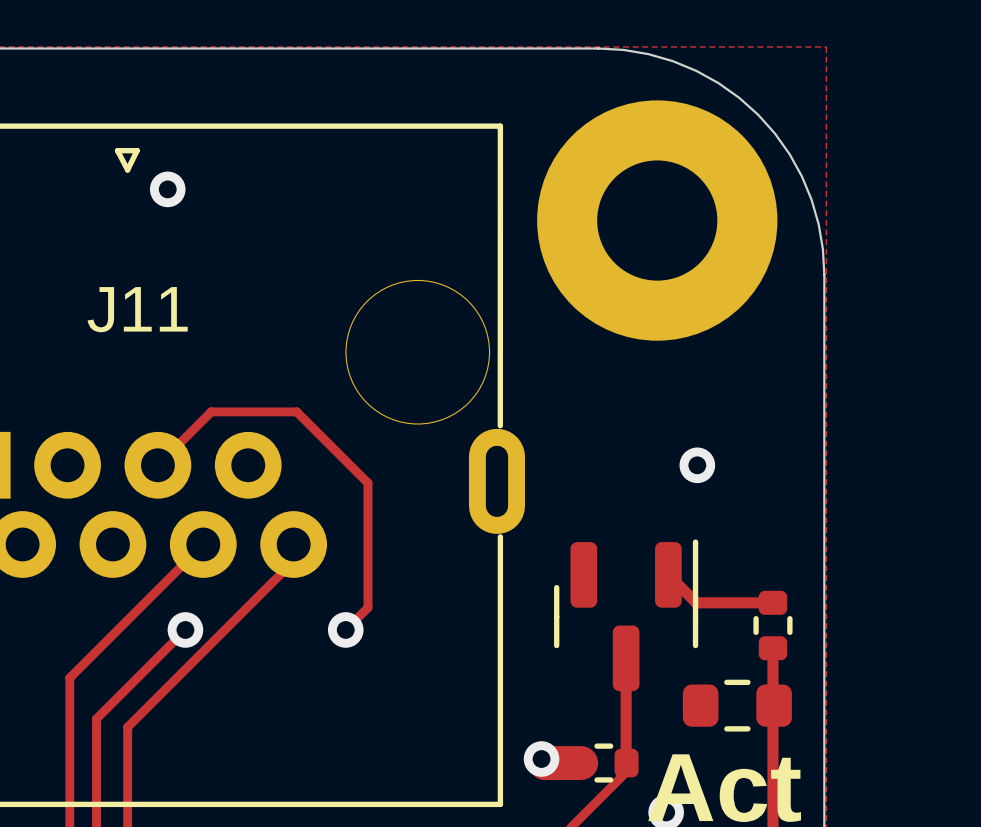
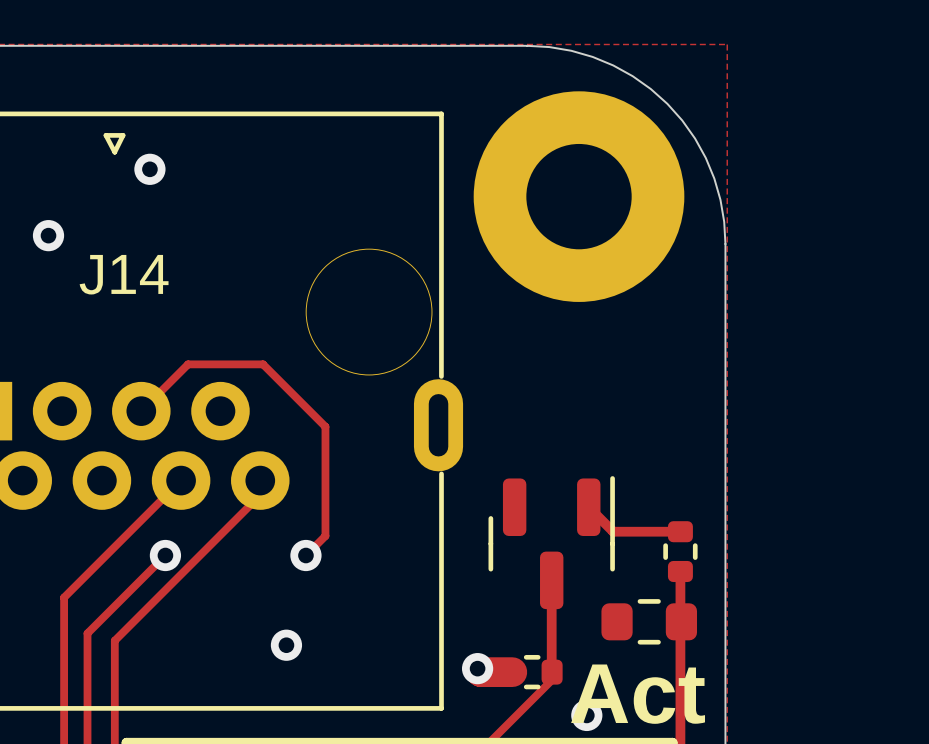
via: none -> (48, 235)
J11 name: J11 (137, 309) -> J14 (124, 274)
via: (697, 465) -> none
via: none -> (286, 645)

